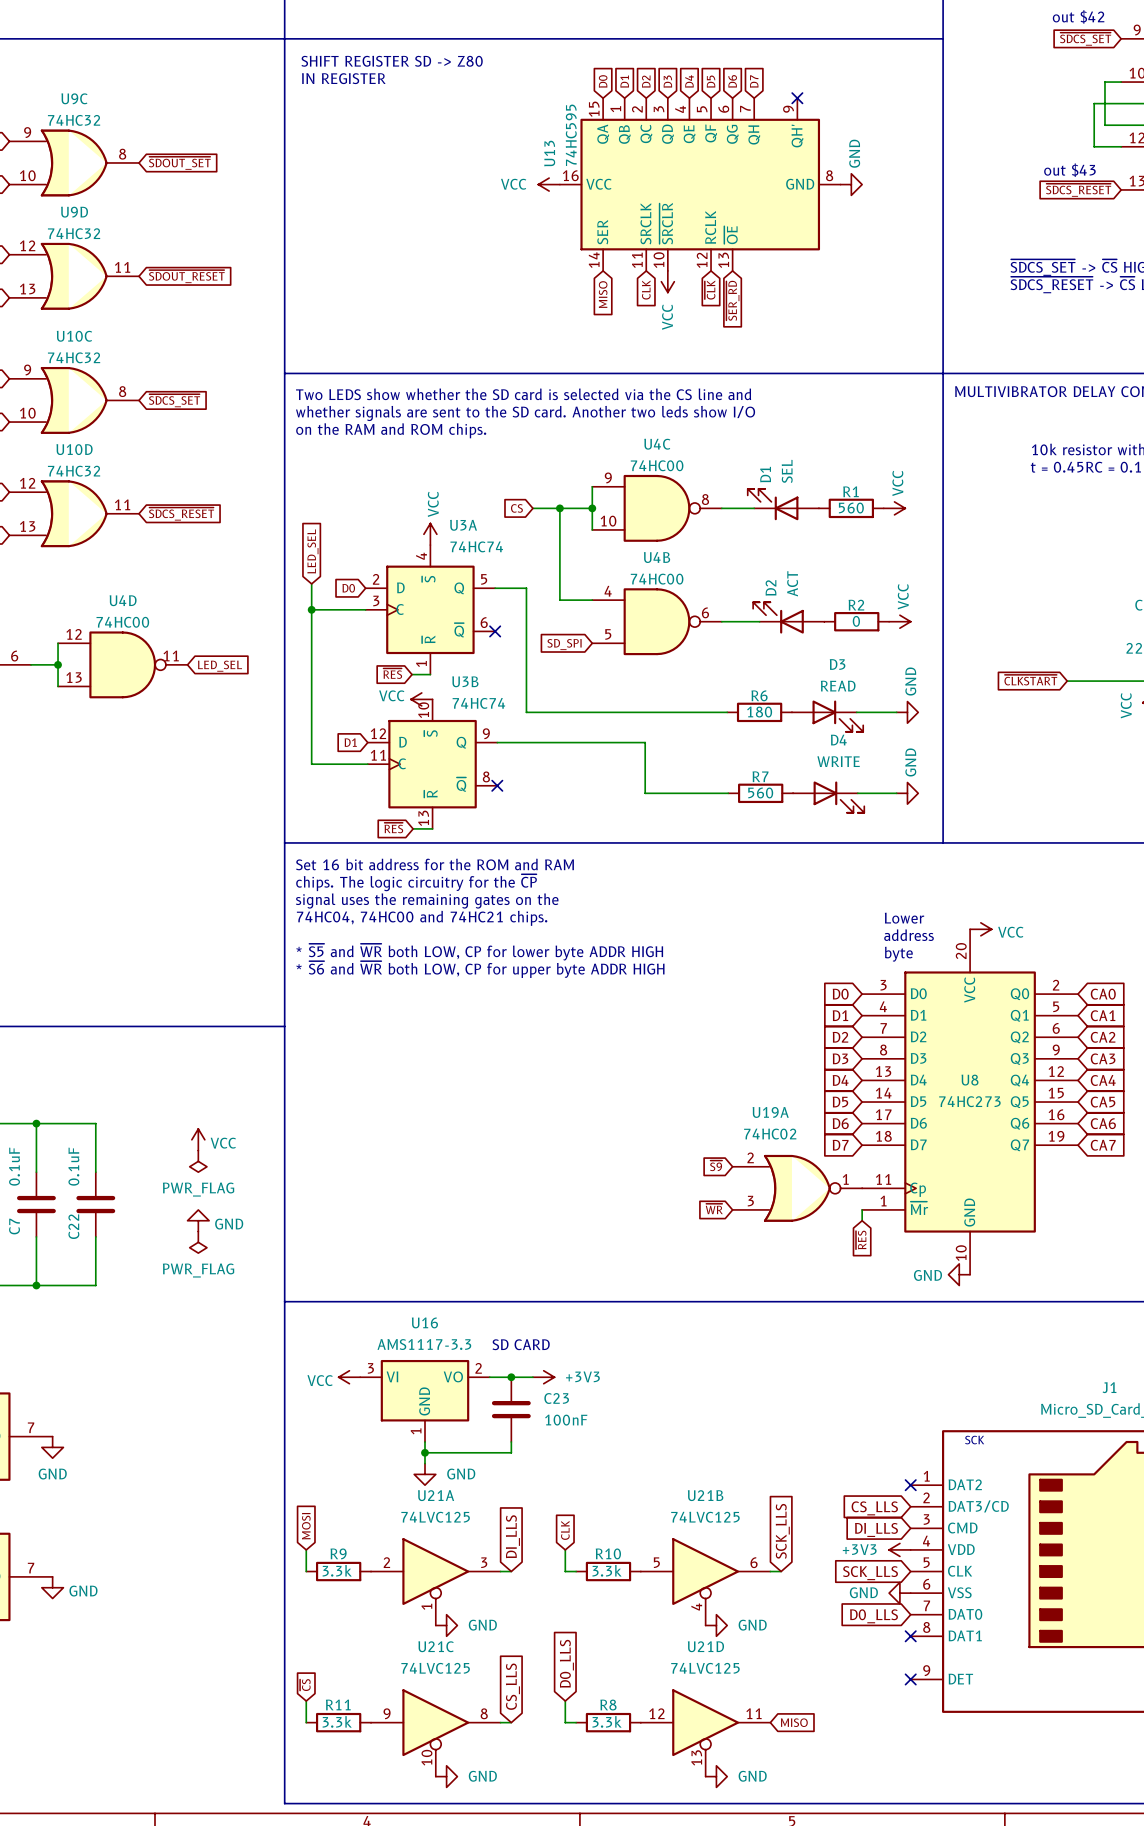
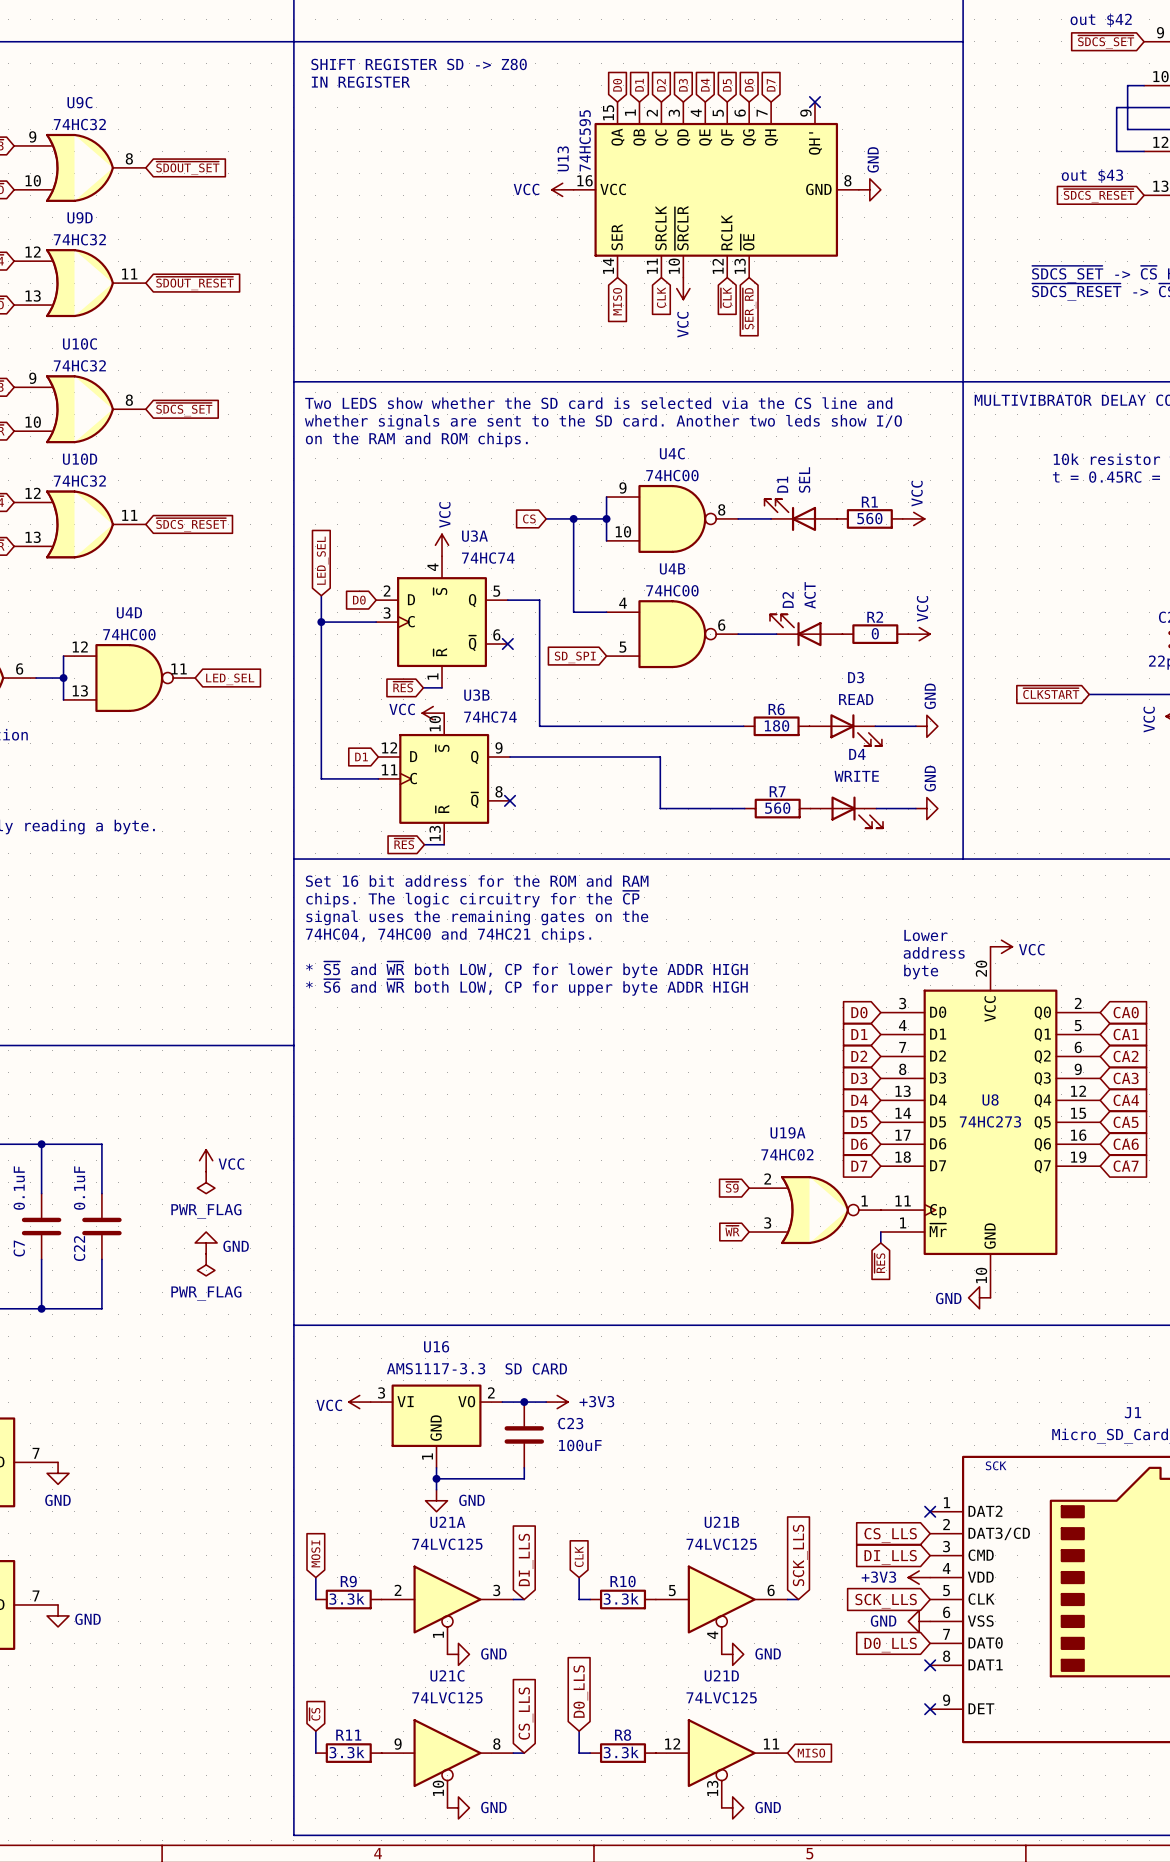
C23 value: 100nF (566, 1420) -> 100uF (580, 1445)

